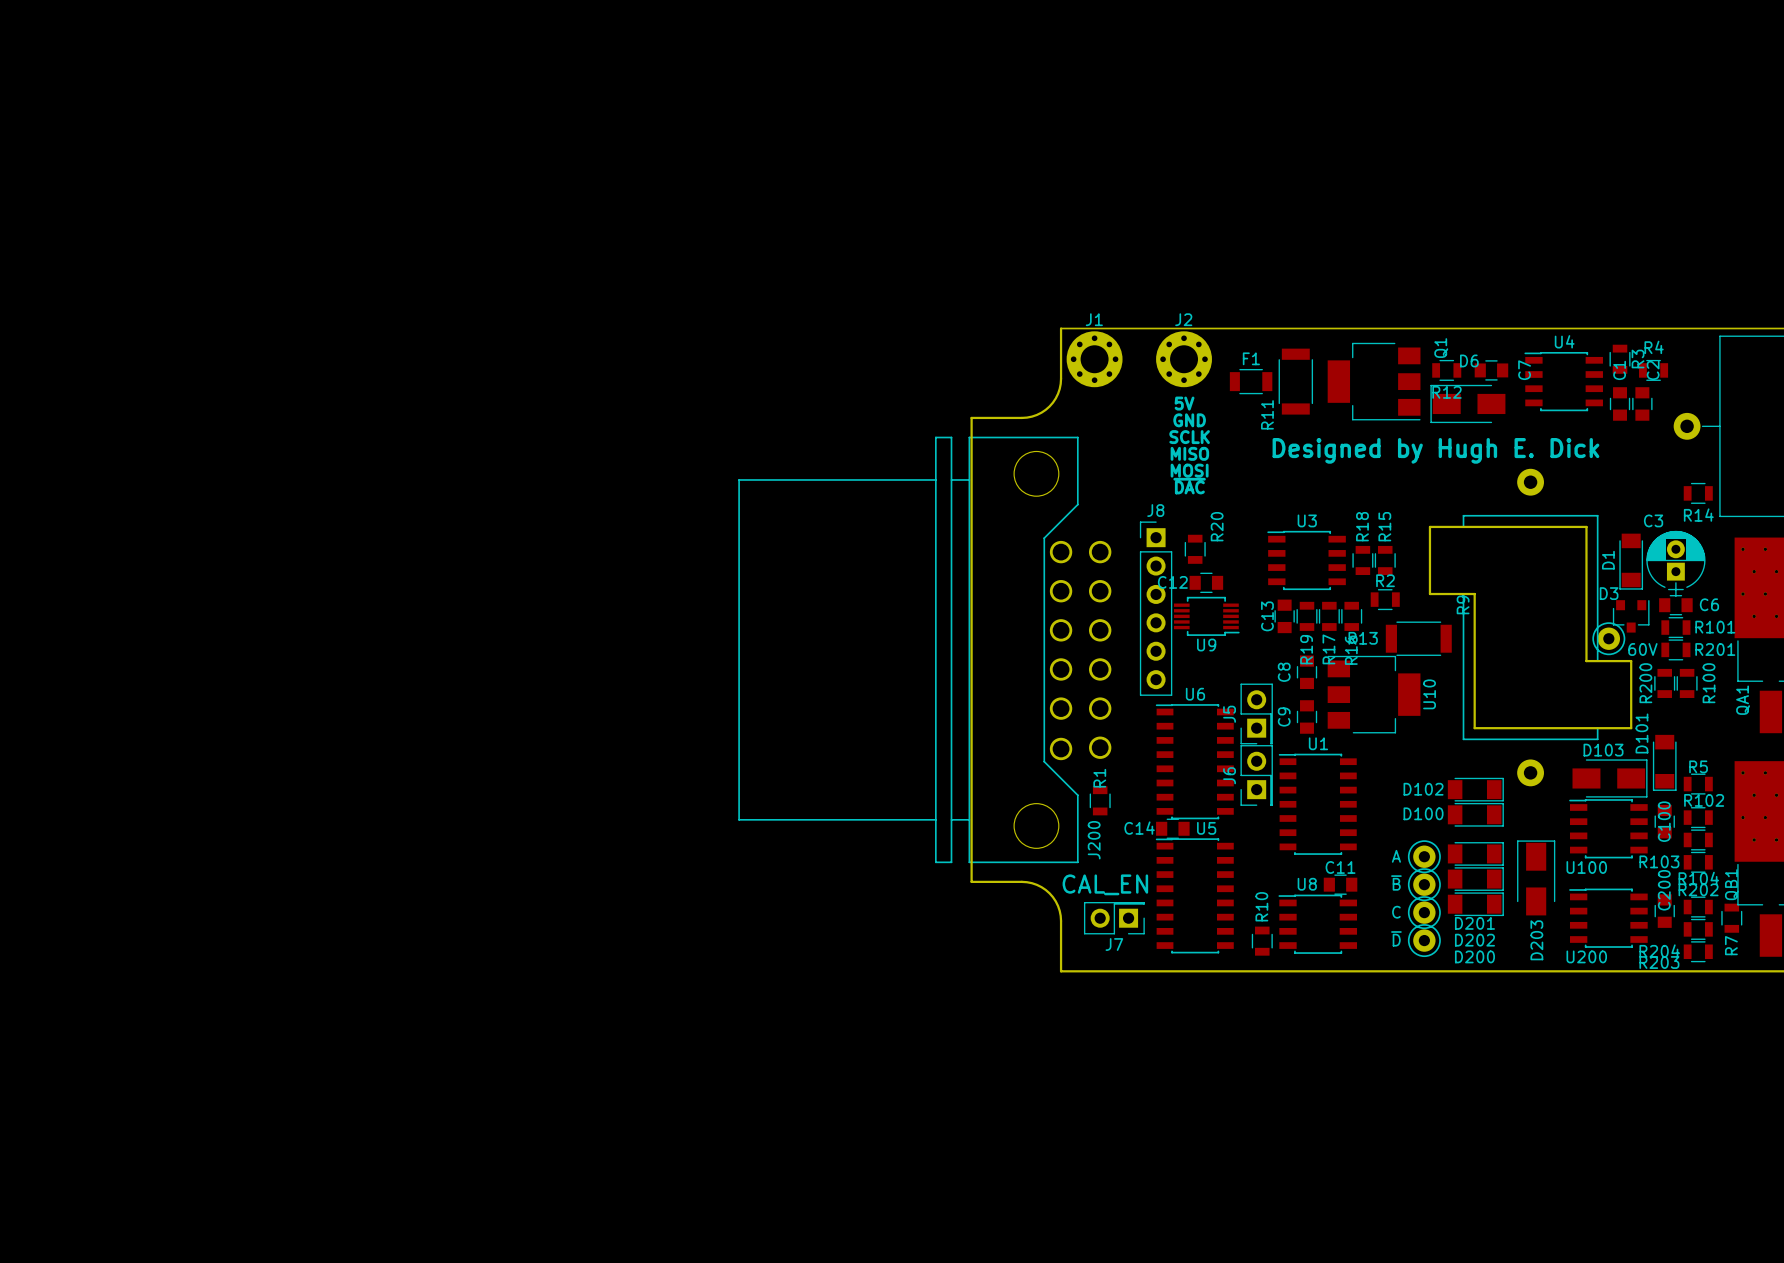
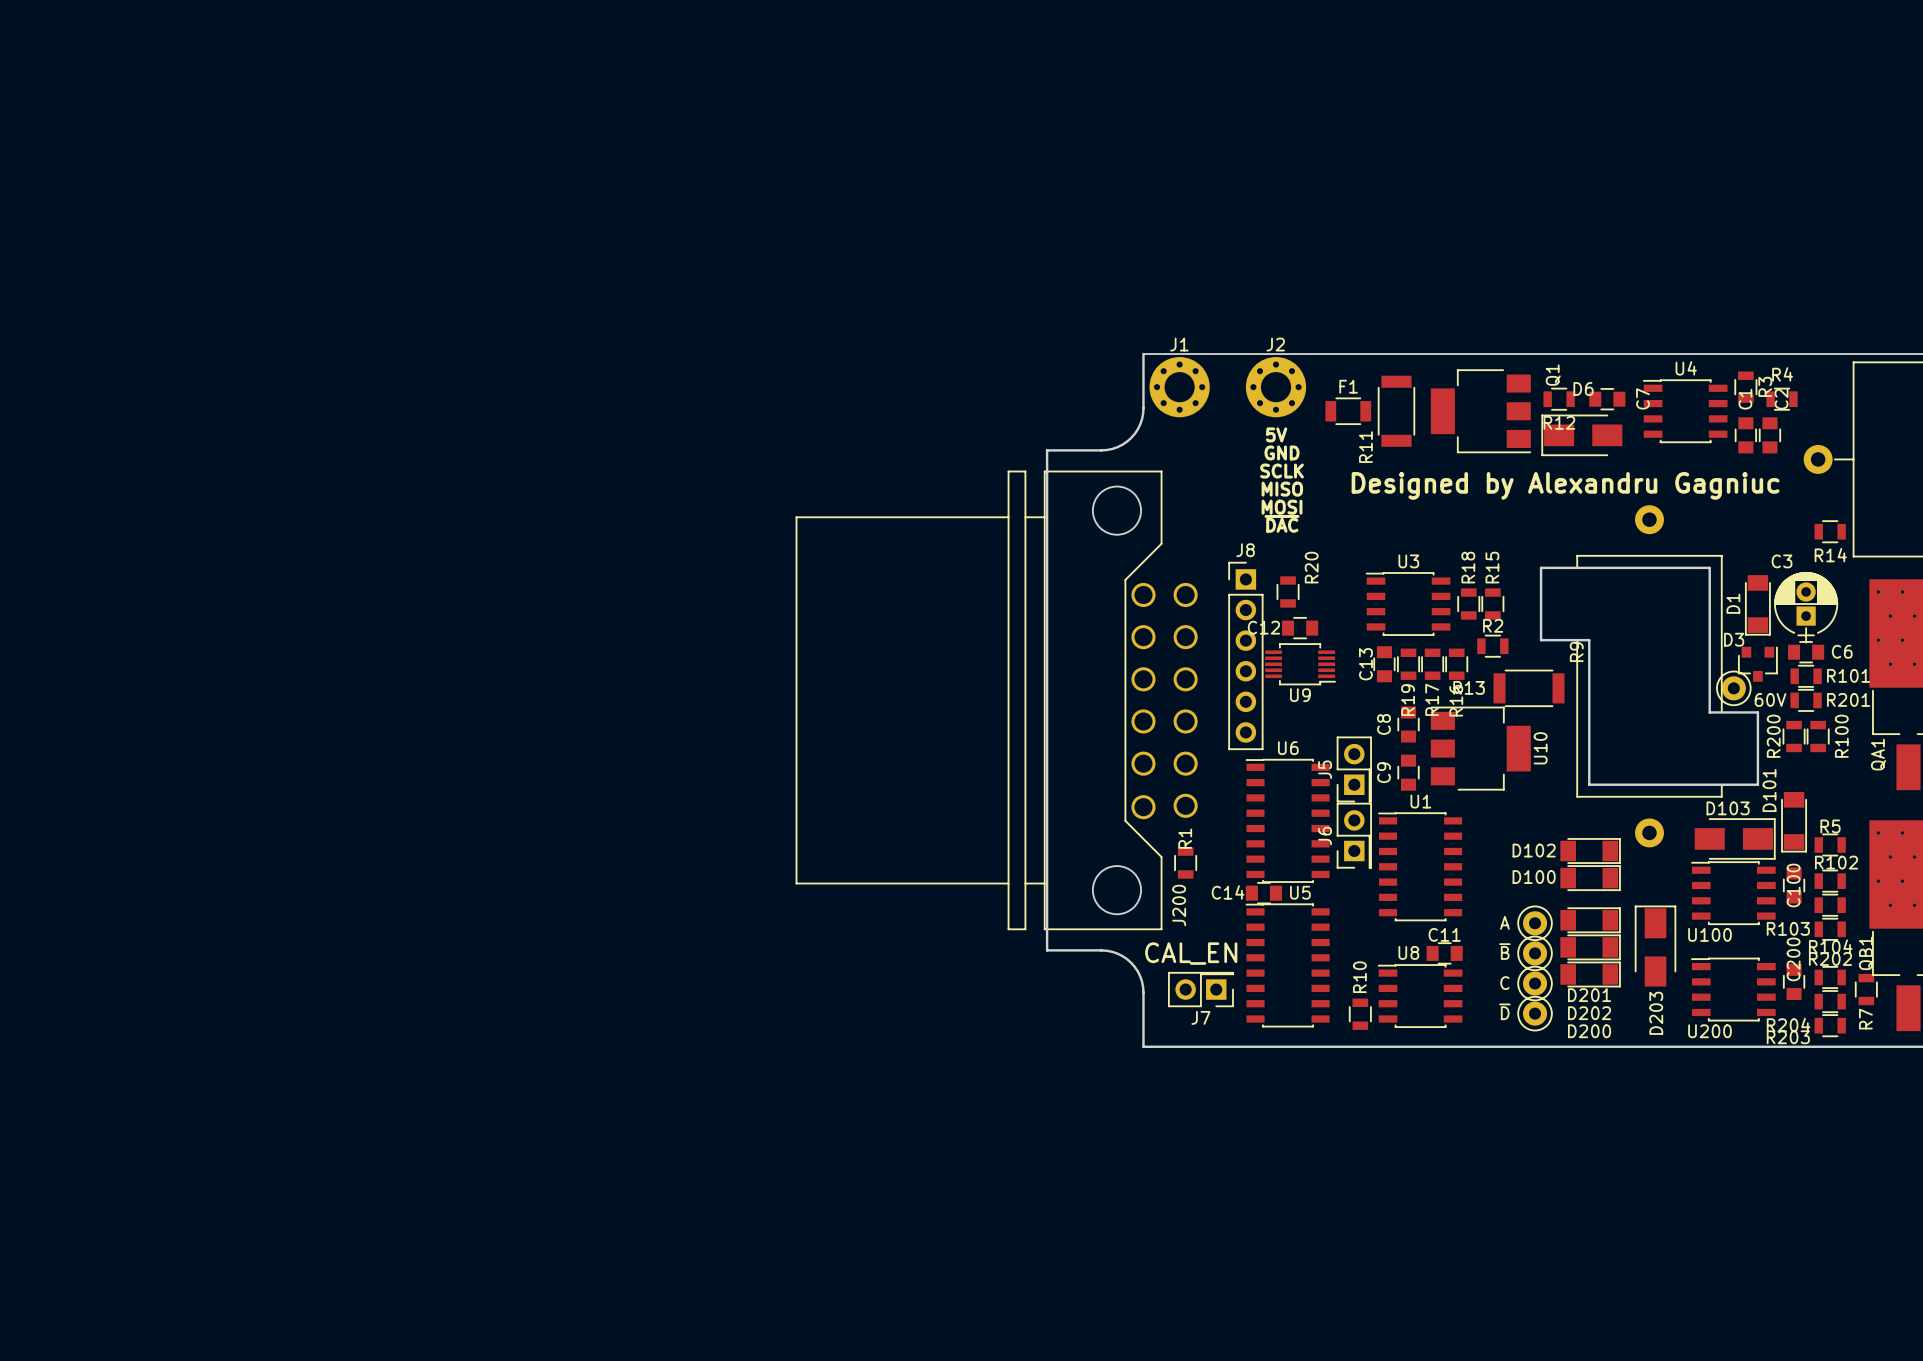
text: Designed by Hugh E. Dick (1435, 450) -> Designed by Alexandru Gagniuc (1565, 485)

